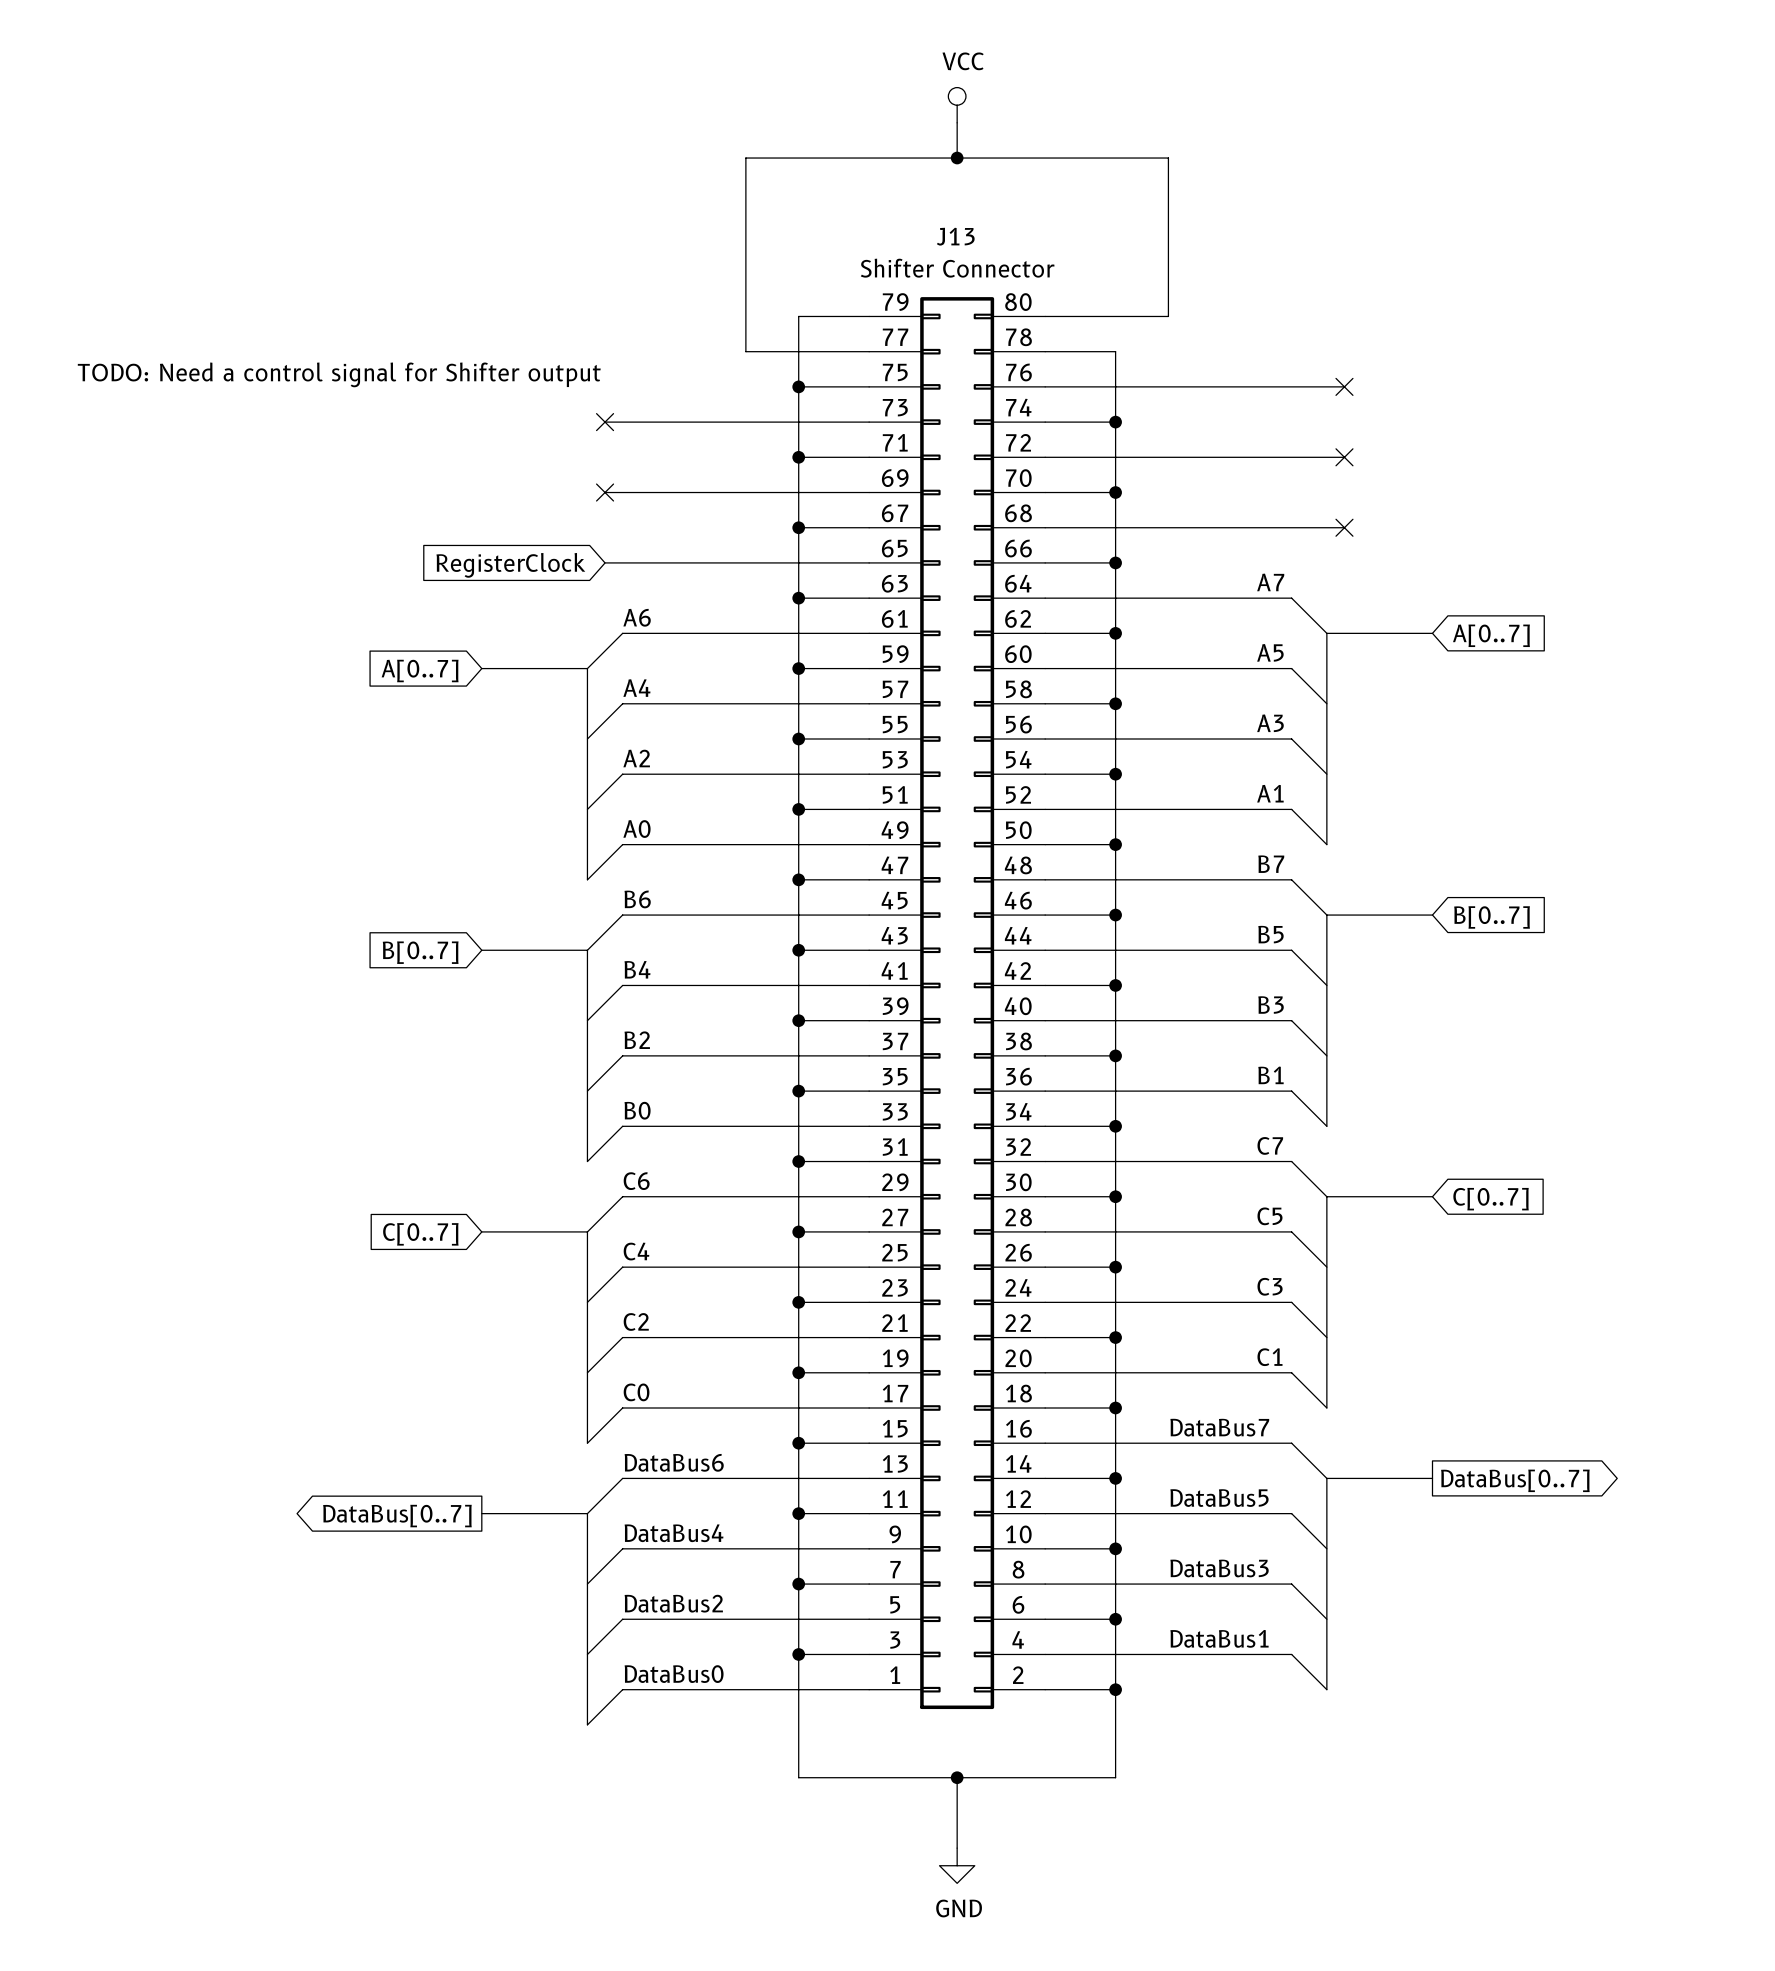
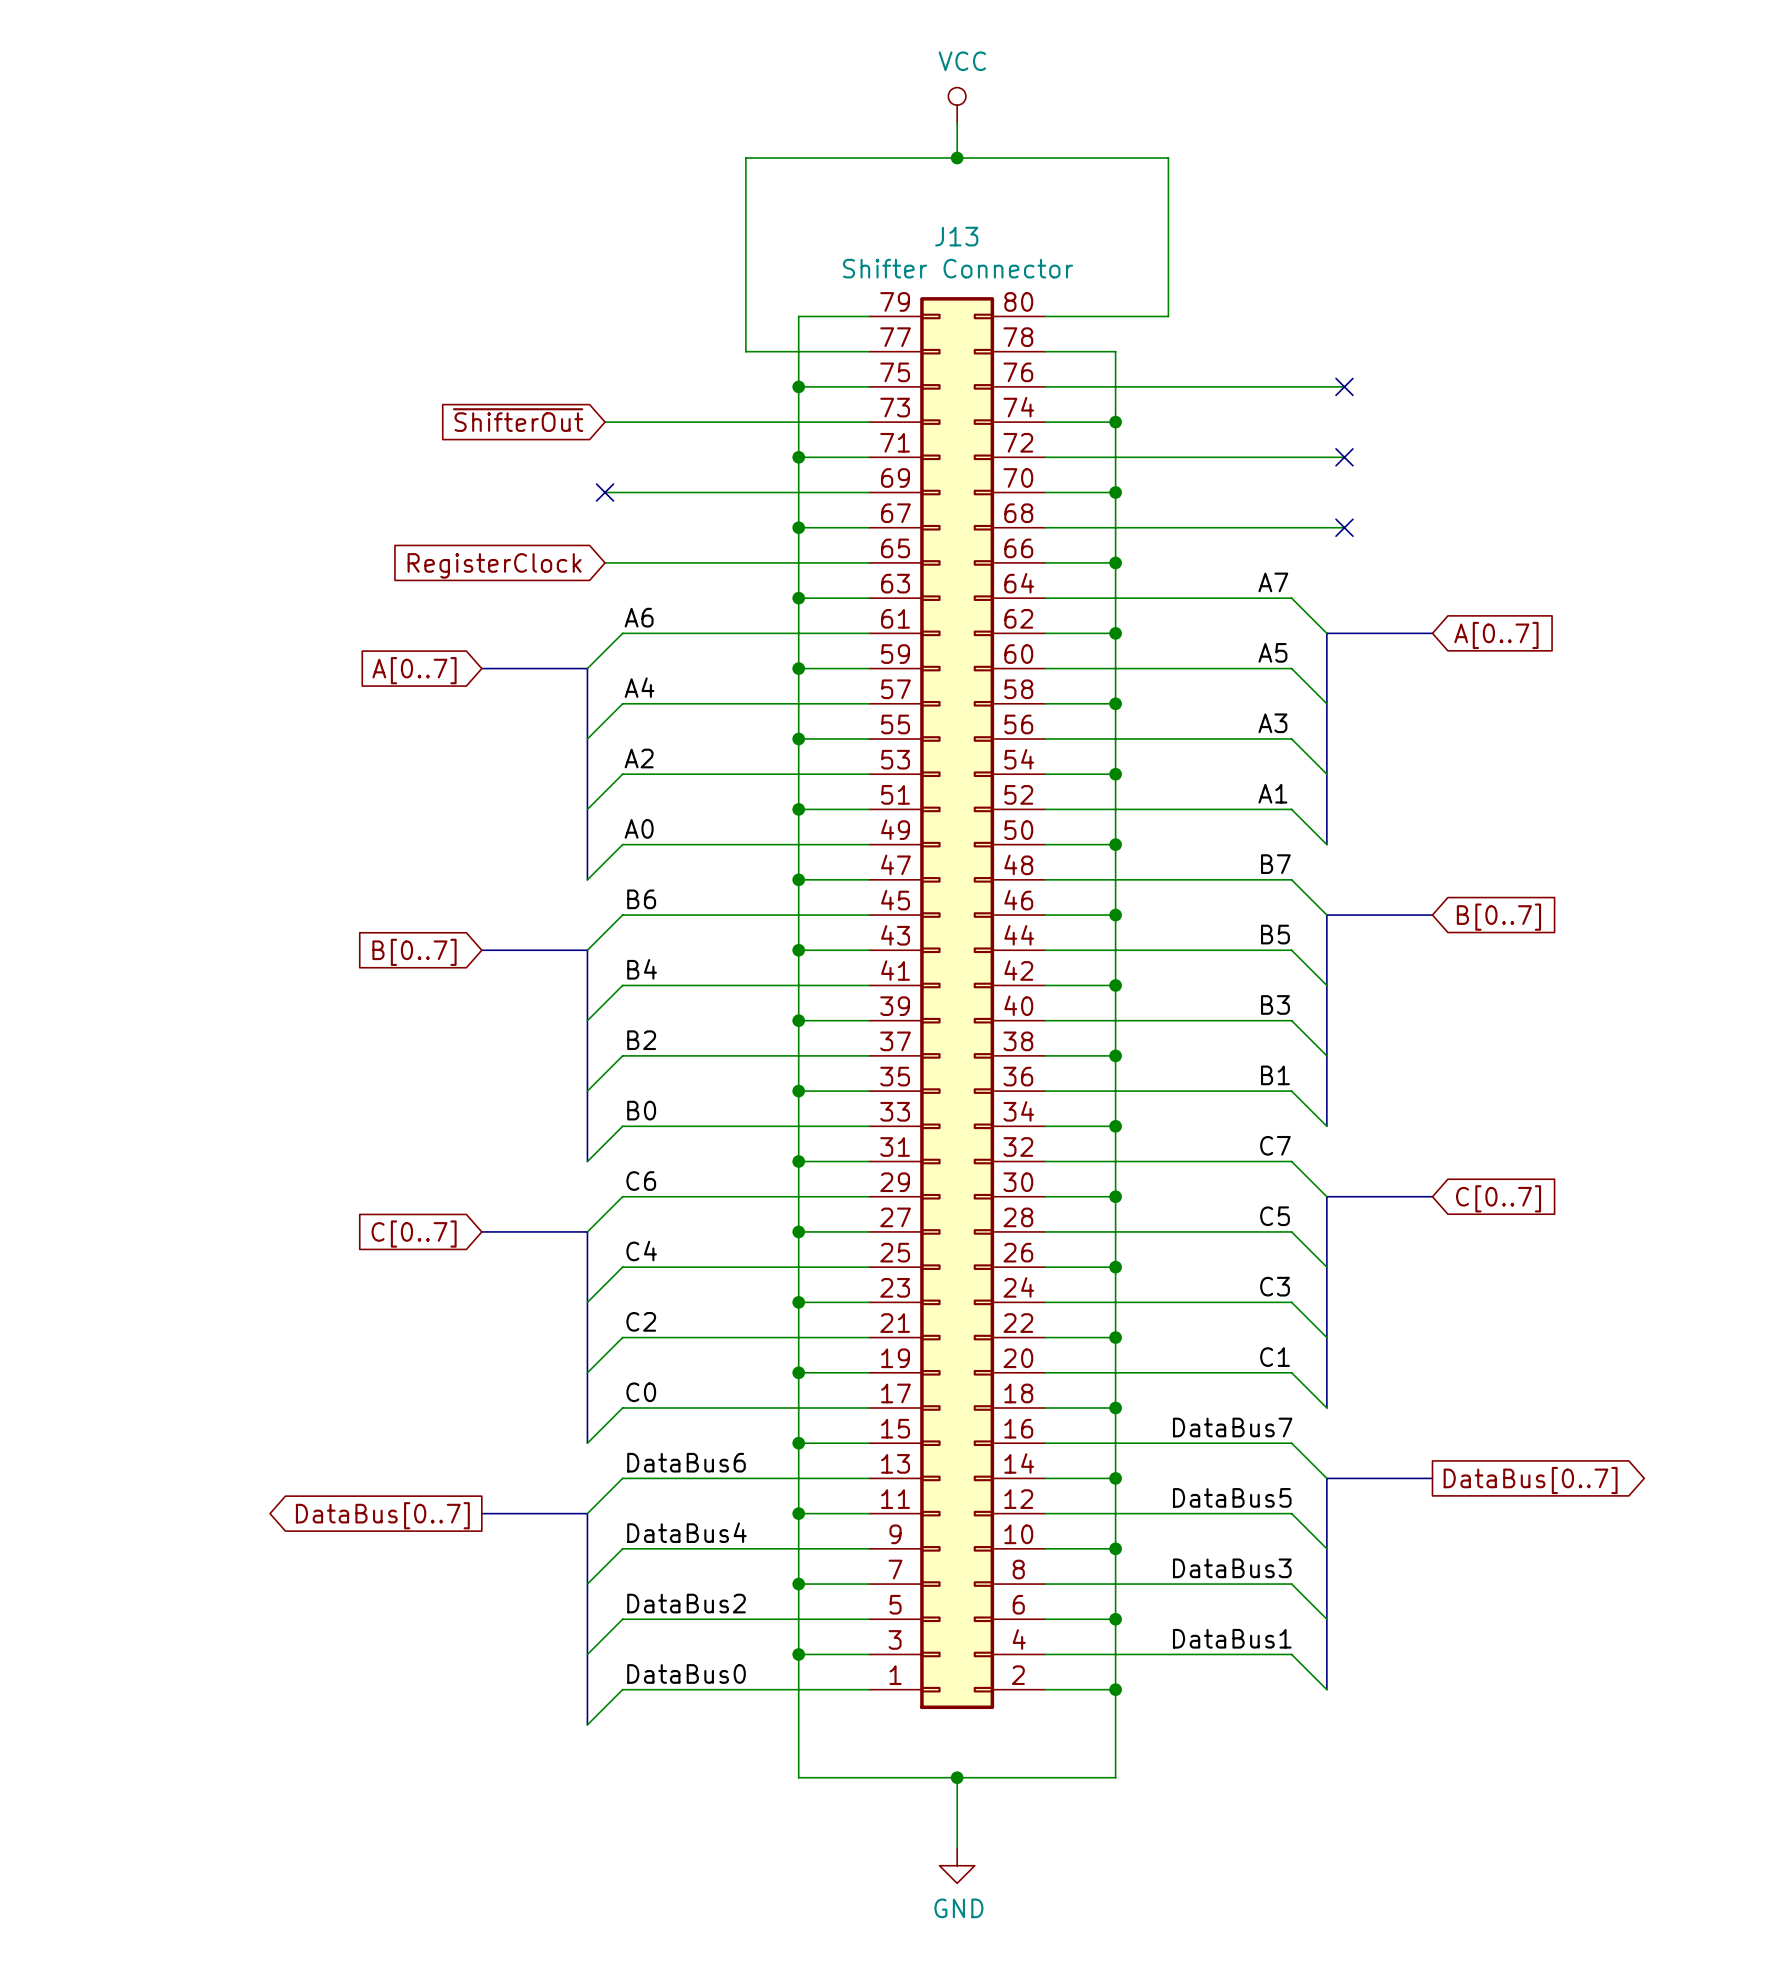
text: TODO: Need a control signal for Shifter output (339, 374) -> none
global label: none -> ~{ShifterOut} (518, 420)
no-connect mark: (605, 422) -> none

